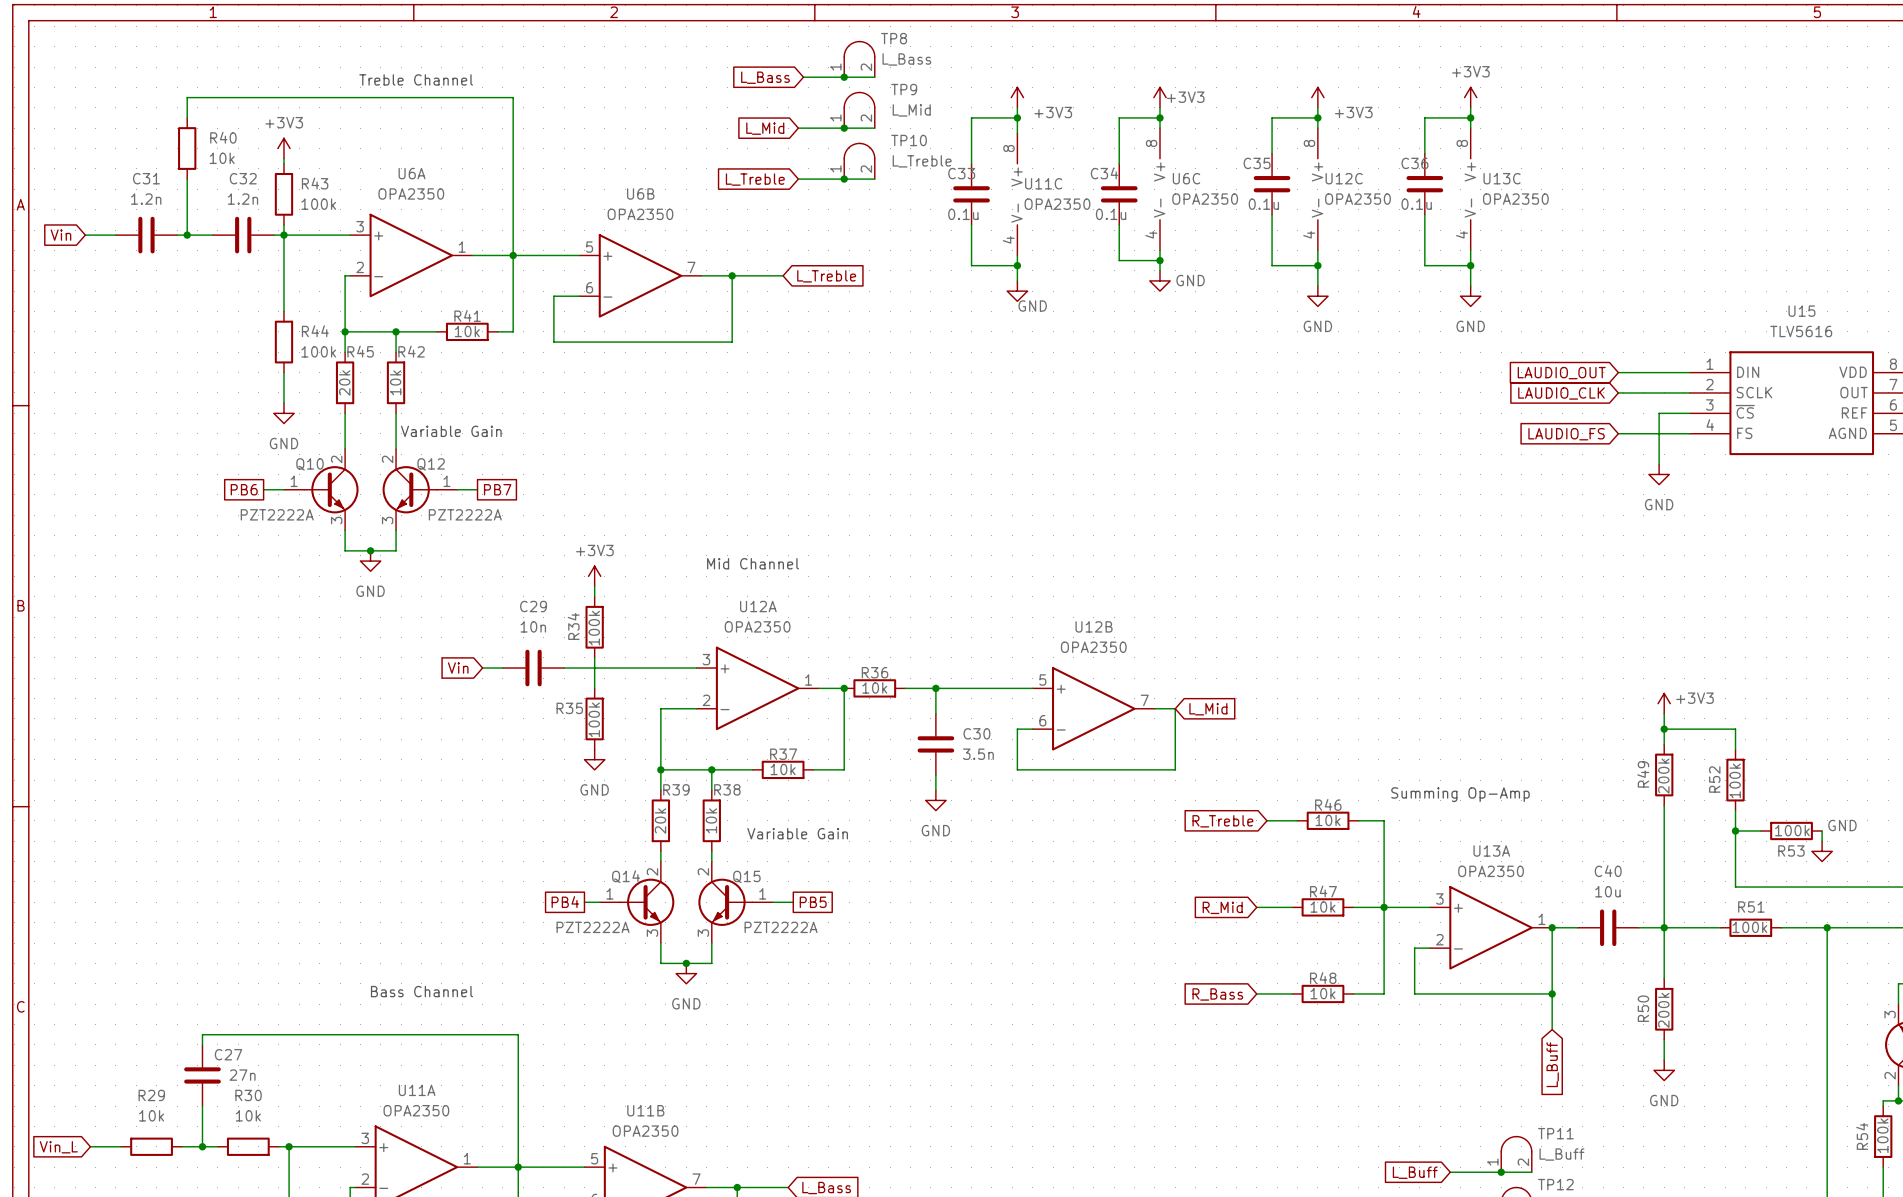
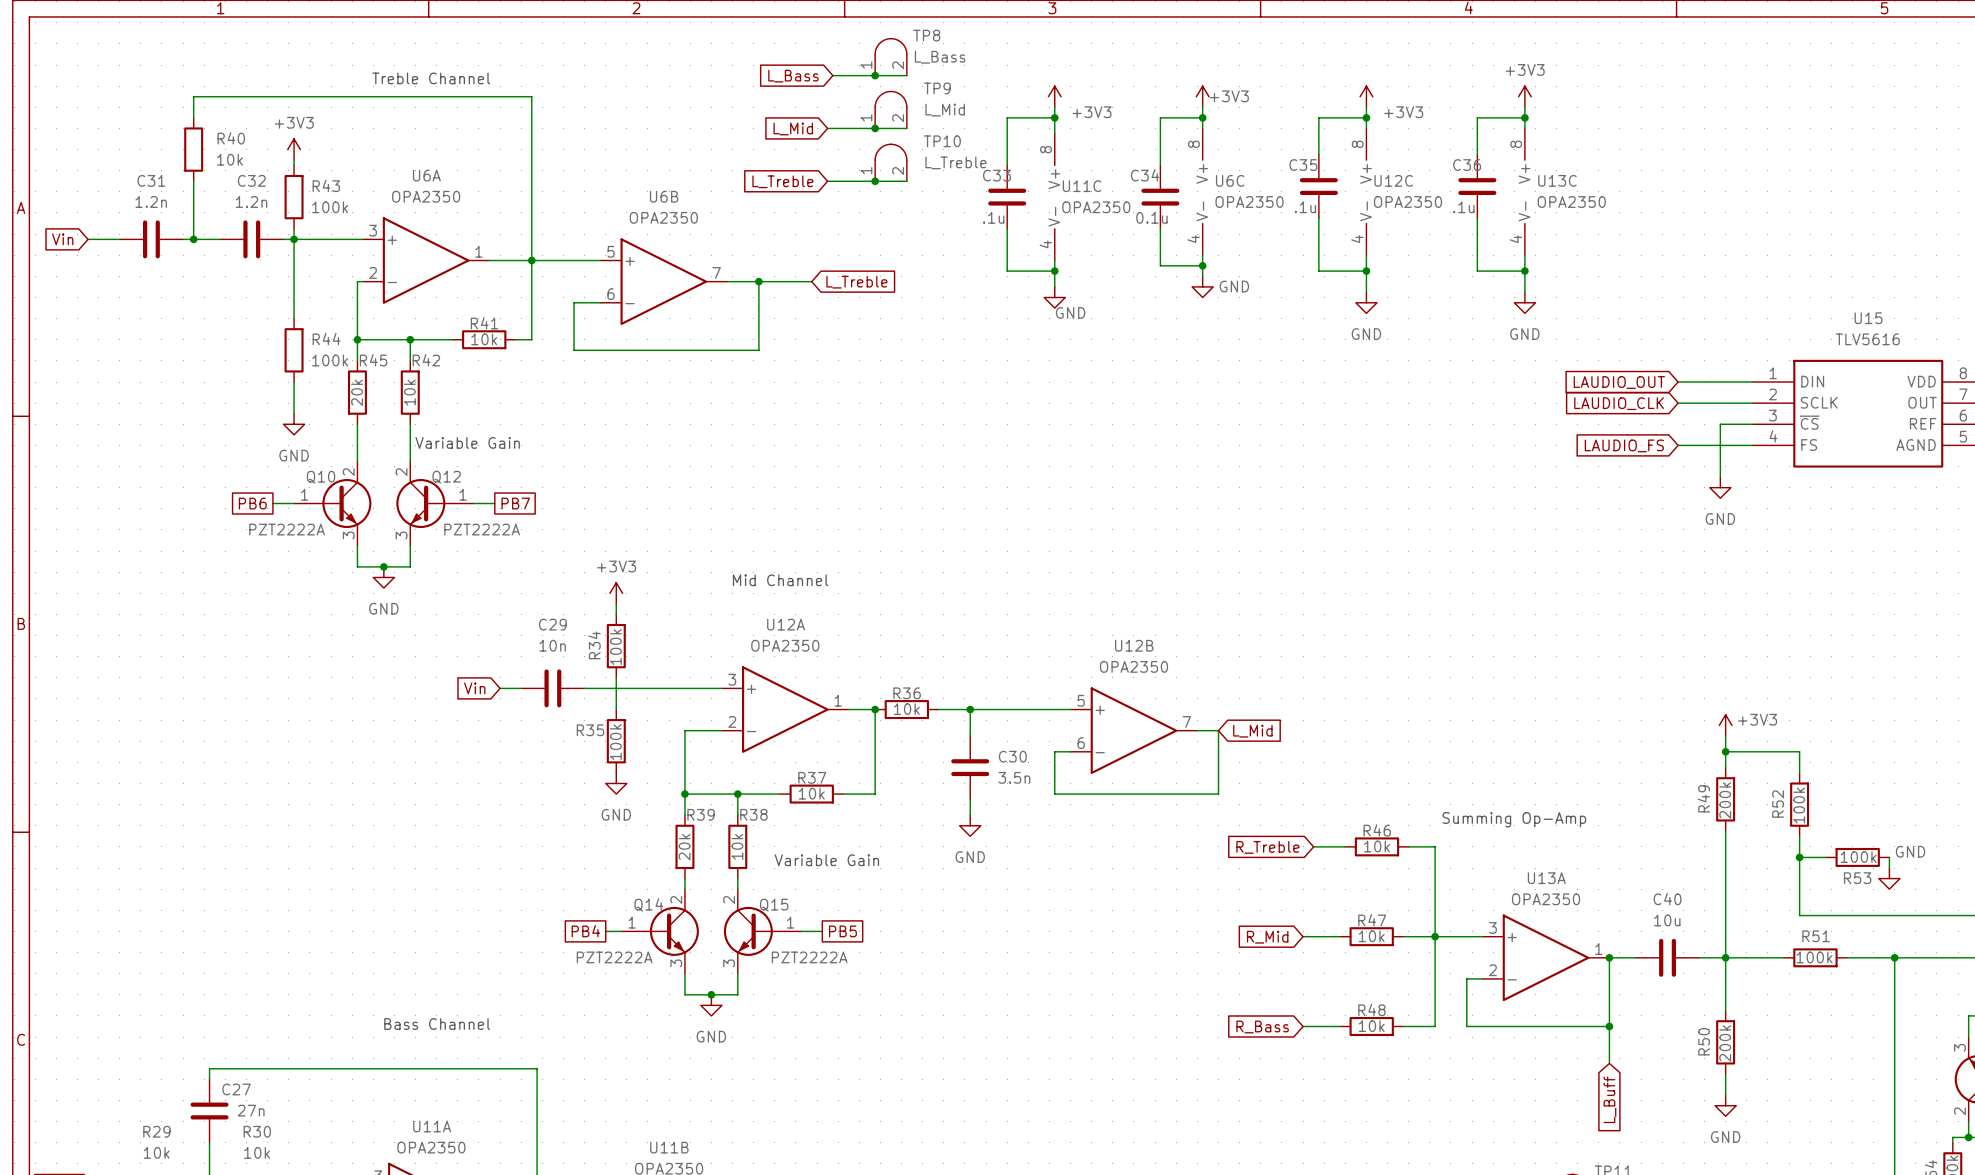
C35 value: 0.1u (1263, 204) -> .1u (1305, 207)
C36 value: 0.1u (1416, 204) -> .1u (1463, 207)
C33 value: 0.1u (963, 214) -> .1u (993, 217)

